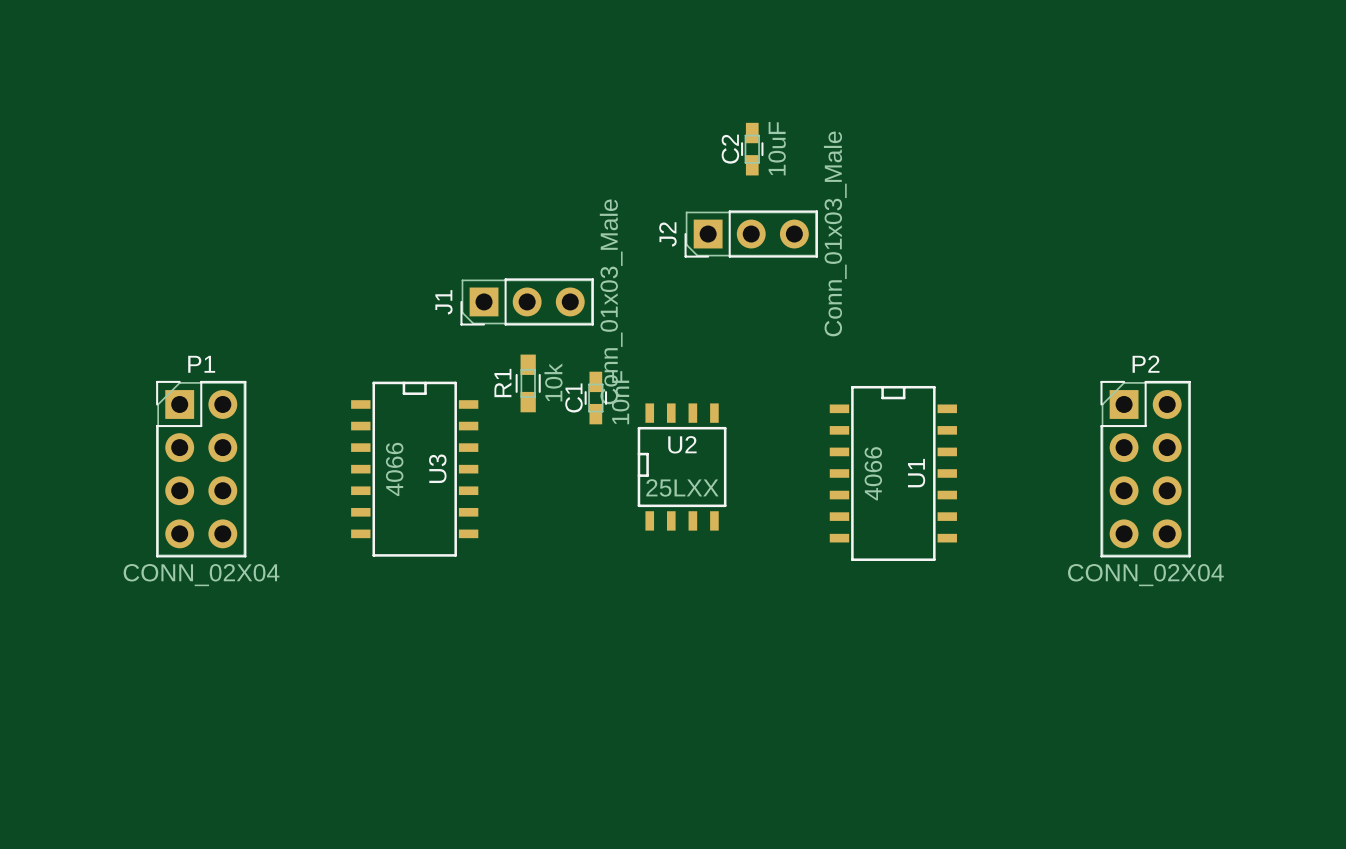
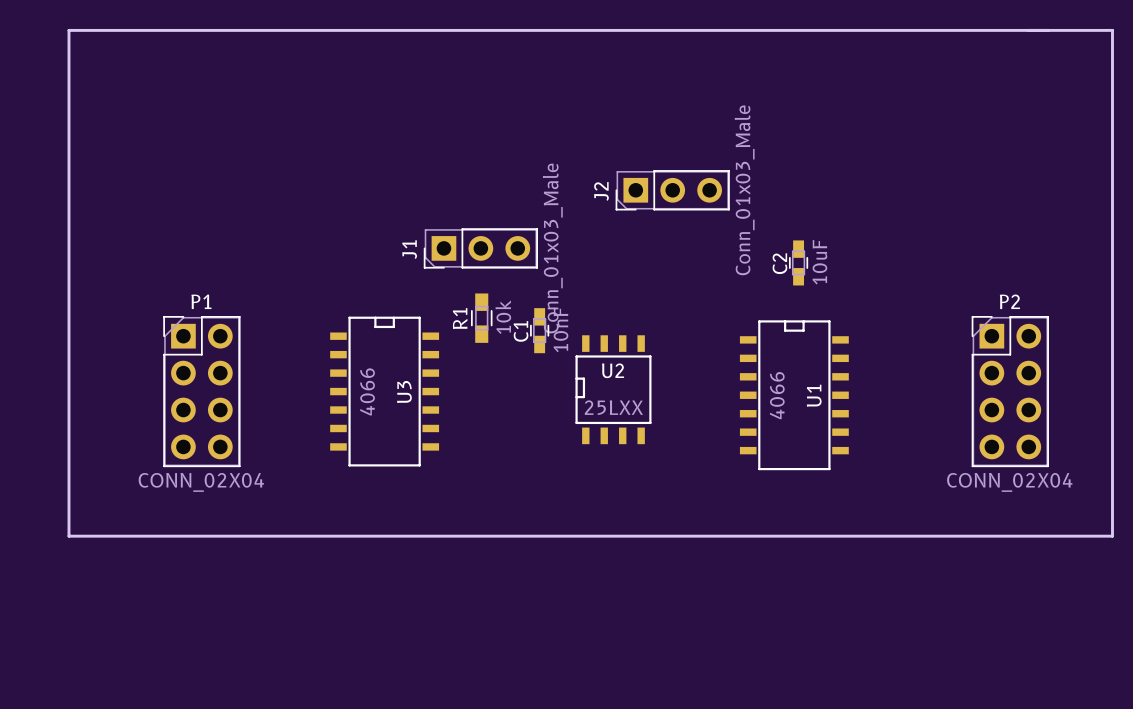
board edge: none -> (68, 30) (1112, 30) (1112, 536) (68, 536) (68, 30)
C2 position: (752, 149) -> (798, 262)

